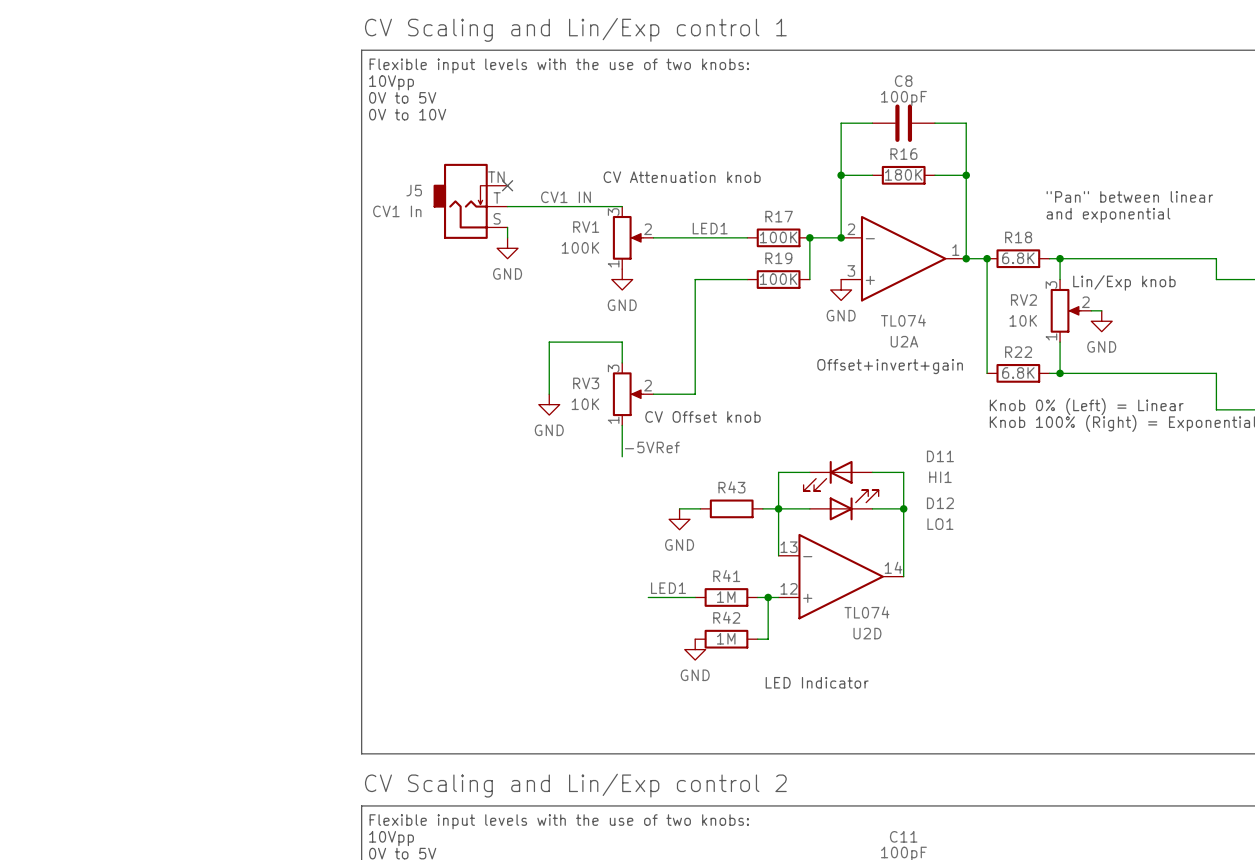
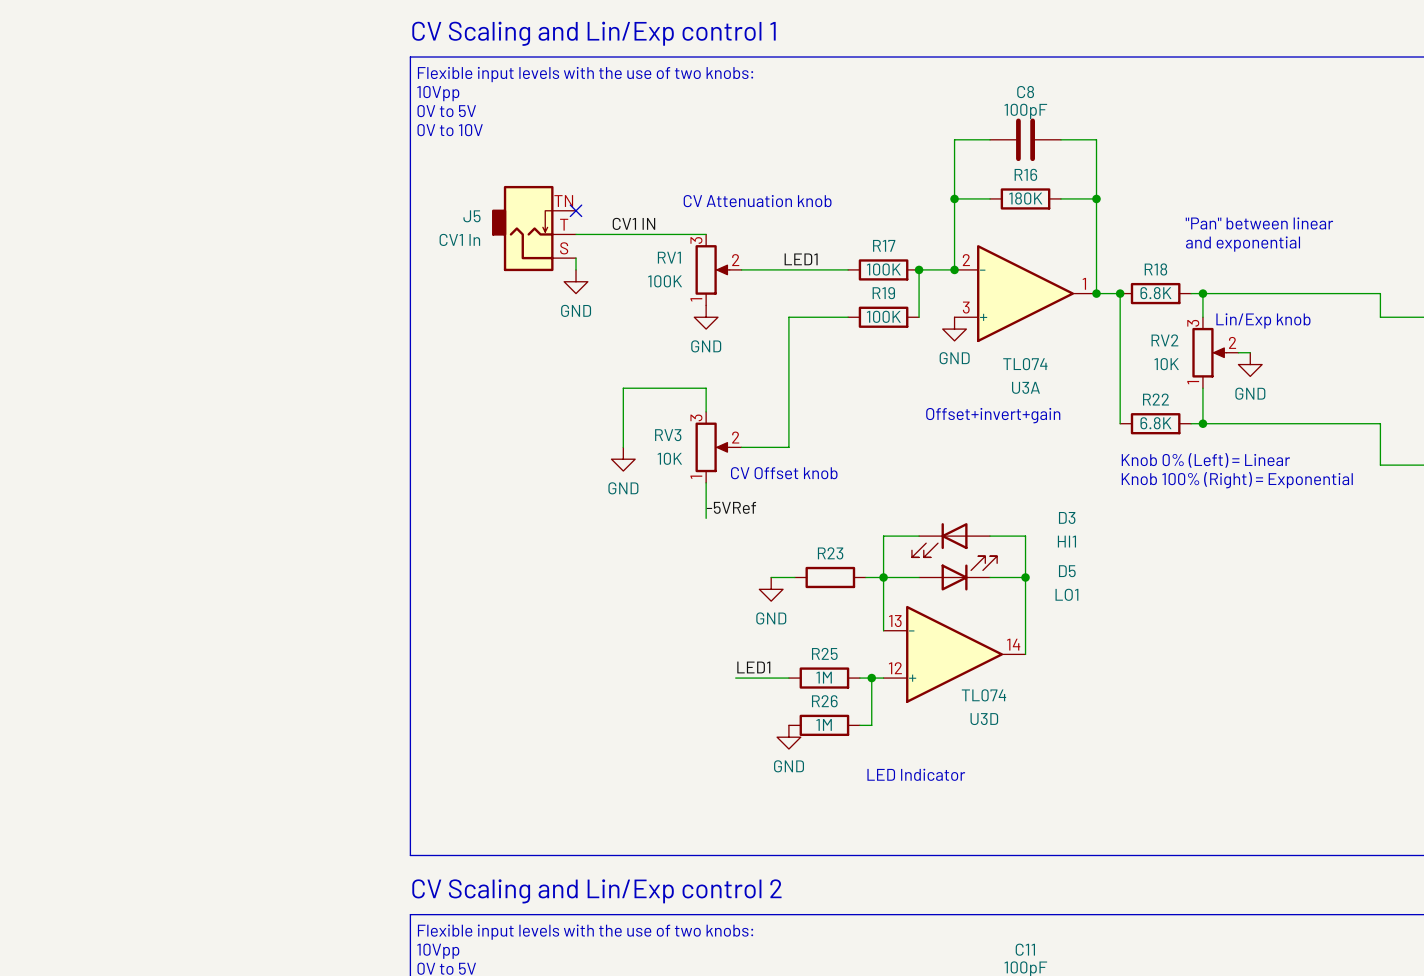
U2A name: U2A (904, 341) -> U3A (1025, 387)
D11 name: D11 (940, 456) -> D3 (1067, 517)
R43 name: R43 (731, 487) -> R23 (830, 553)
D12 name: D12 (940, 503) -> D5 (1067, 571)
R41 name: R41 (726, 576) -> R25 (824, 653)
R42 name: R42 (726, 617) -> R26 (824, 701)
U2D name: U2D (867, 633) -> U3D (984, 719)

